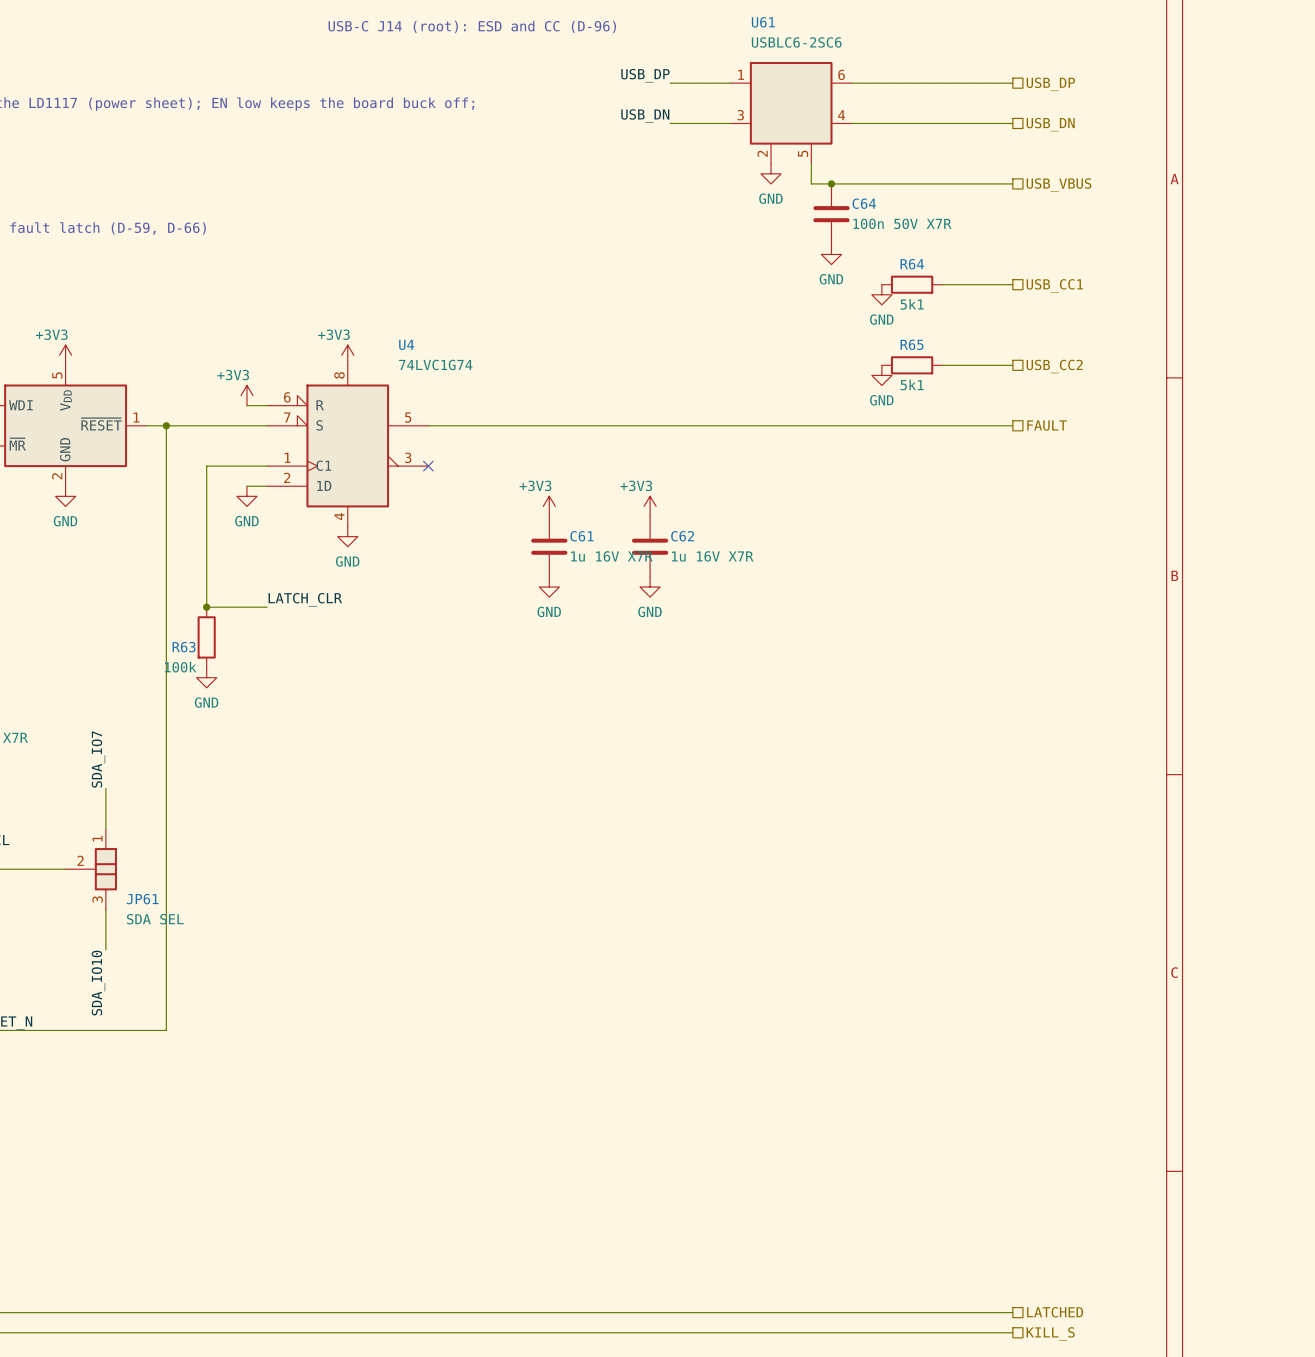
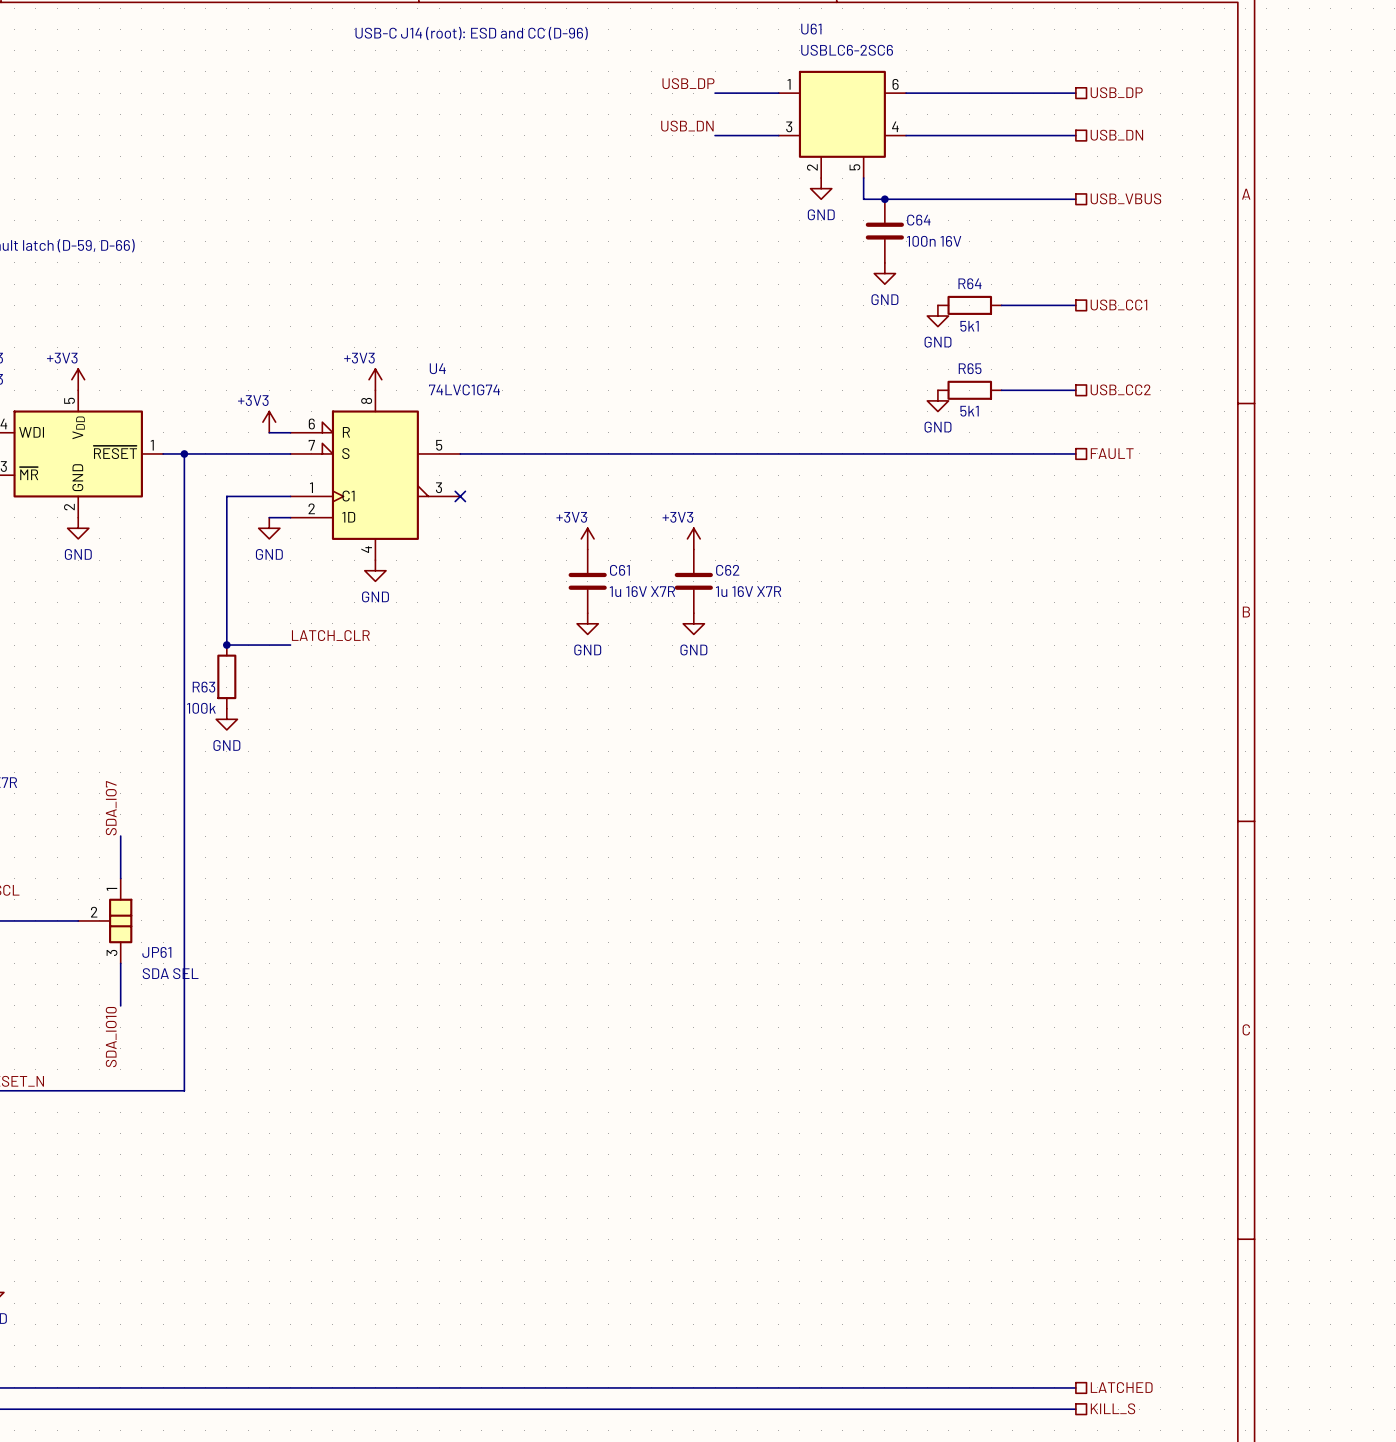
C64 value: 100n 50V X7R (902, 223) -> 100n 16V (934, 241)

